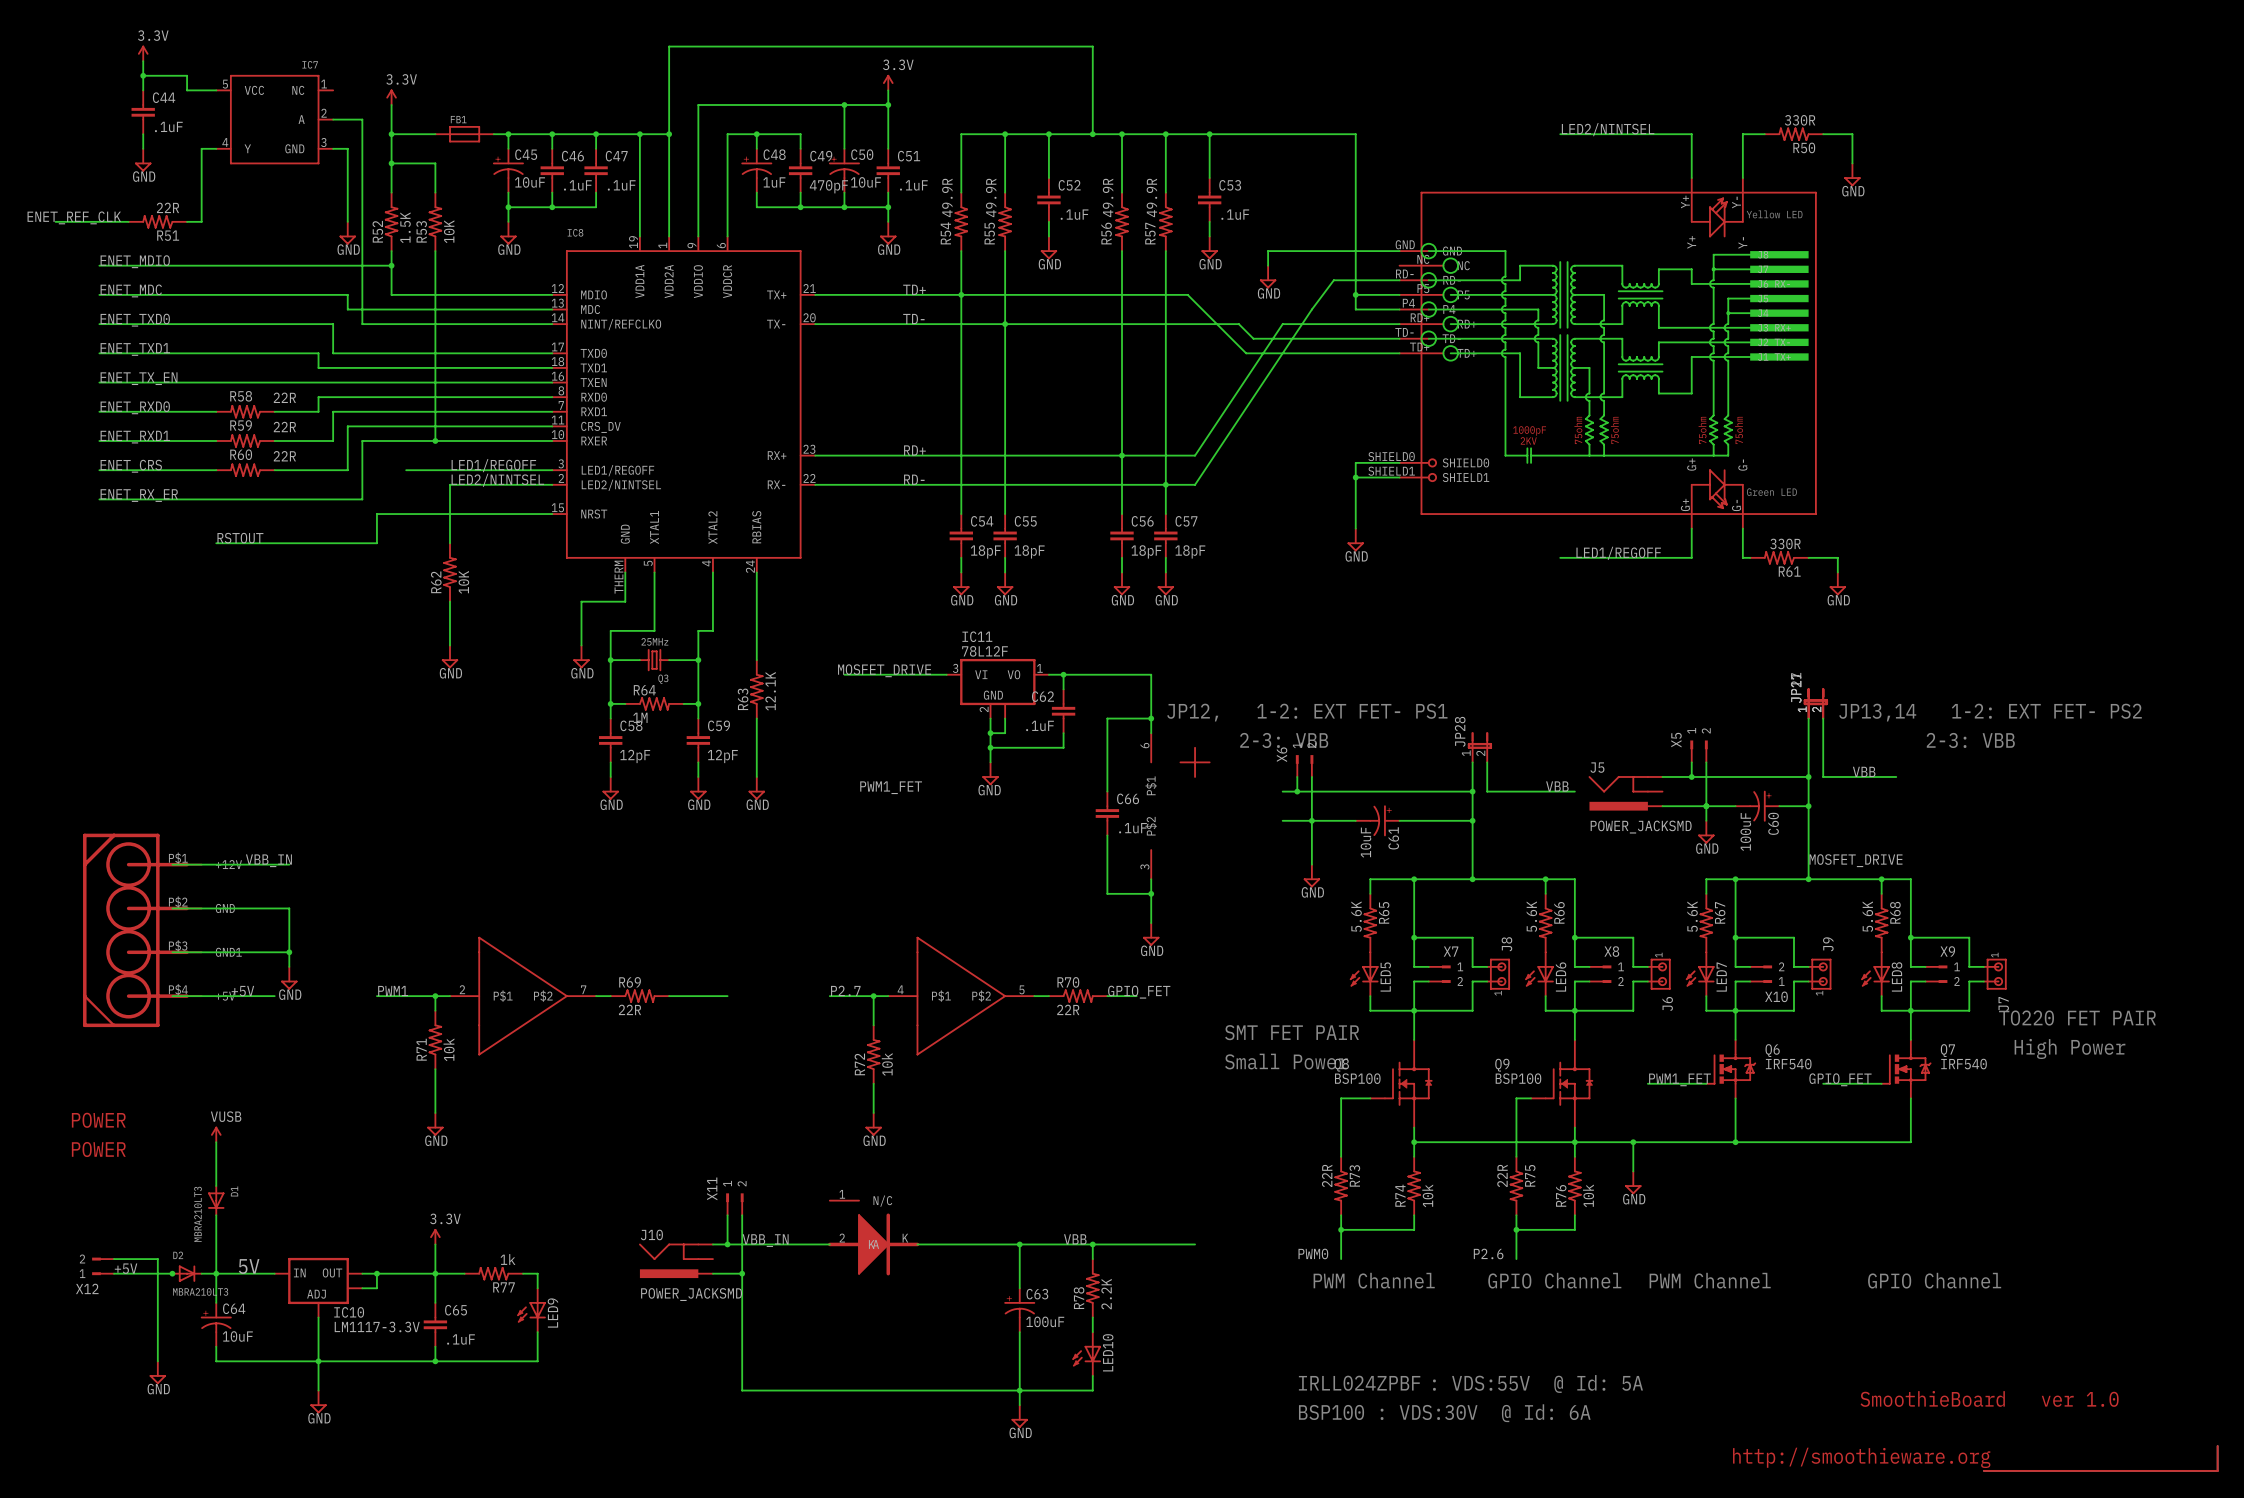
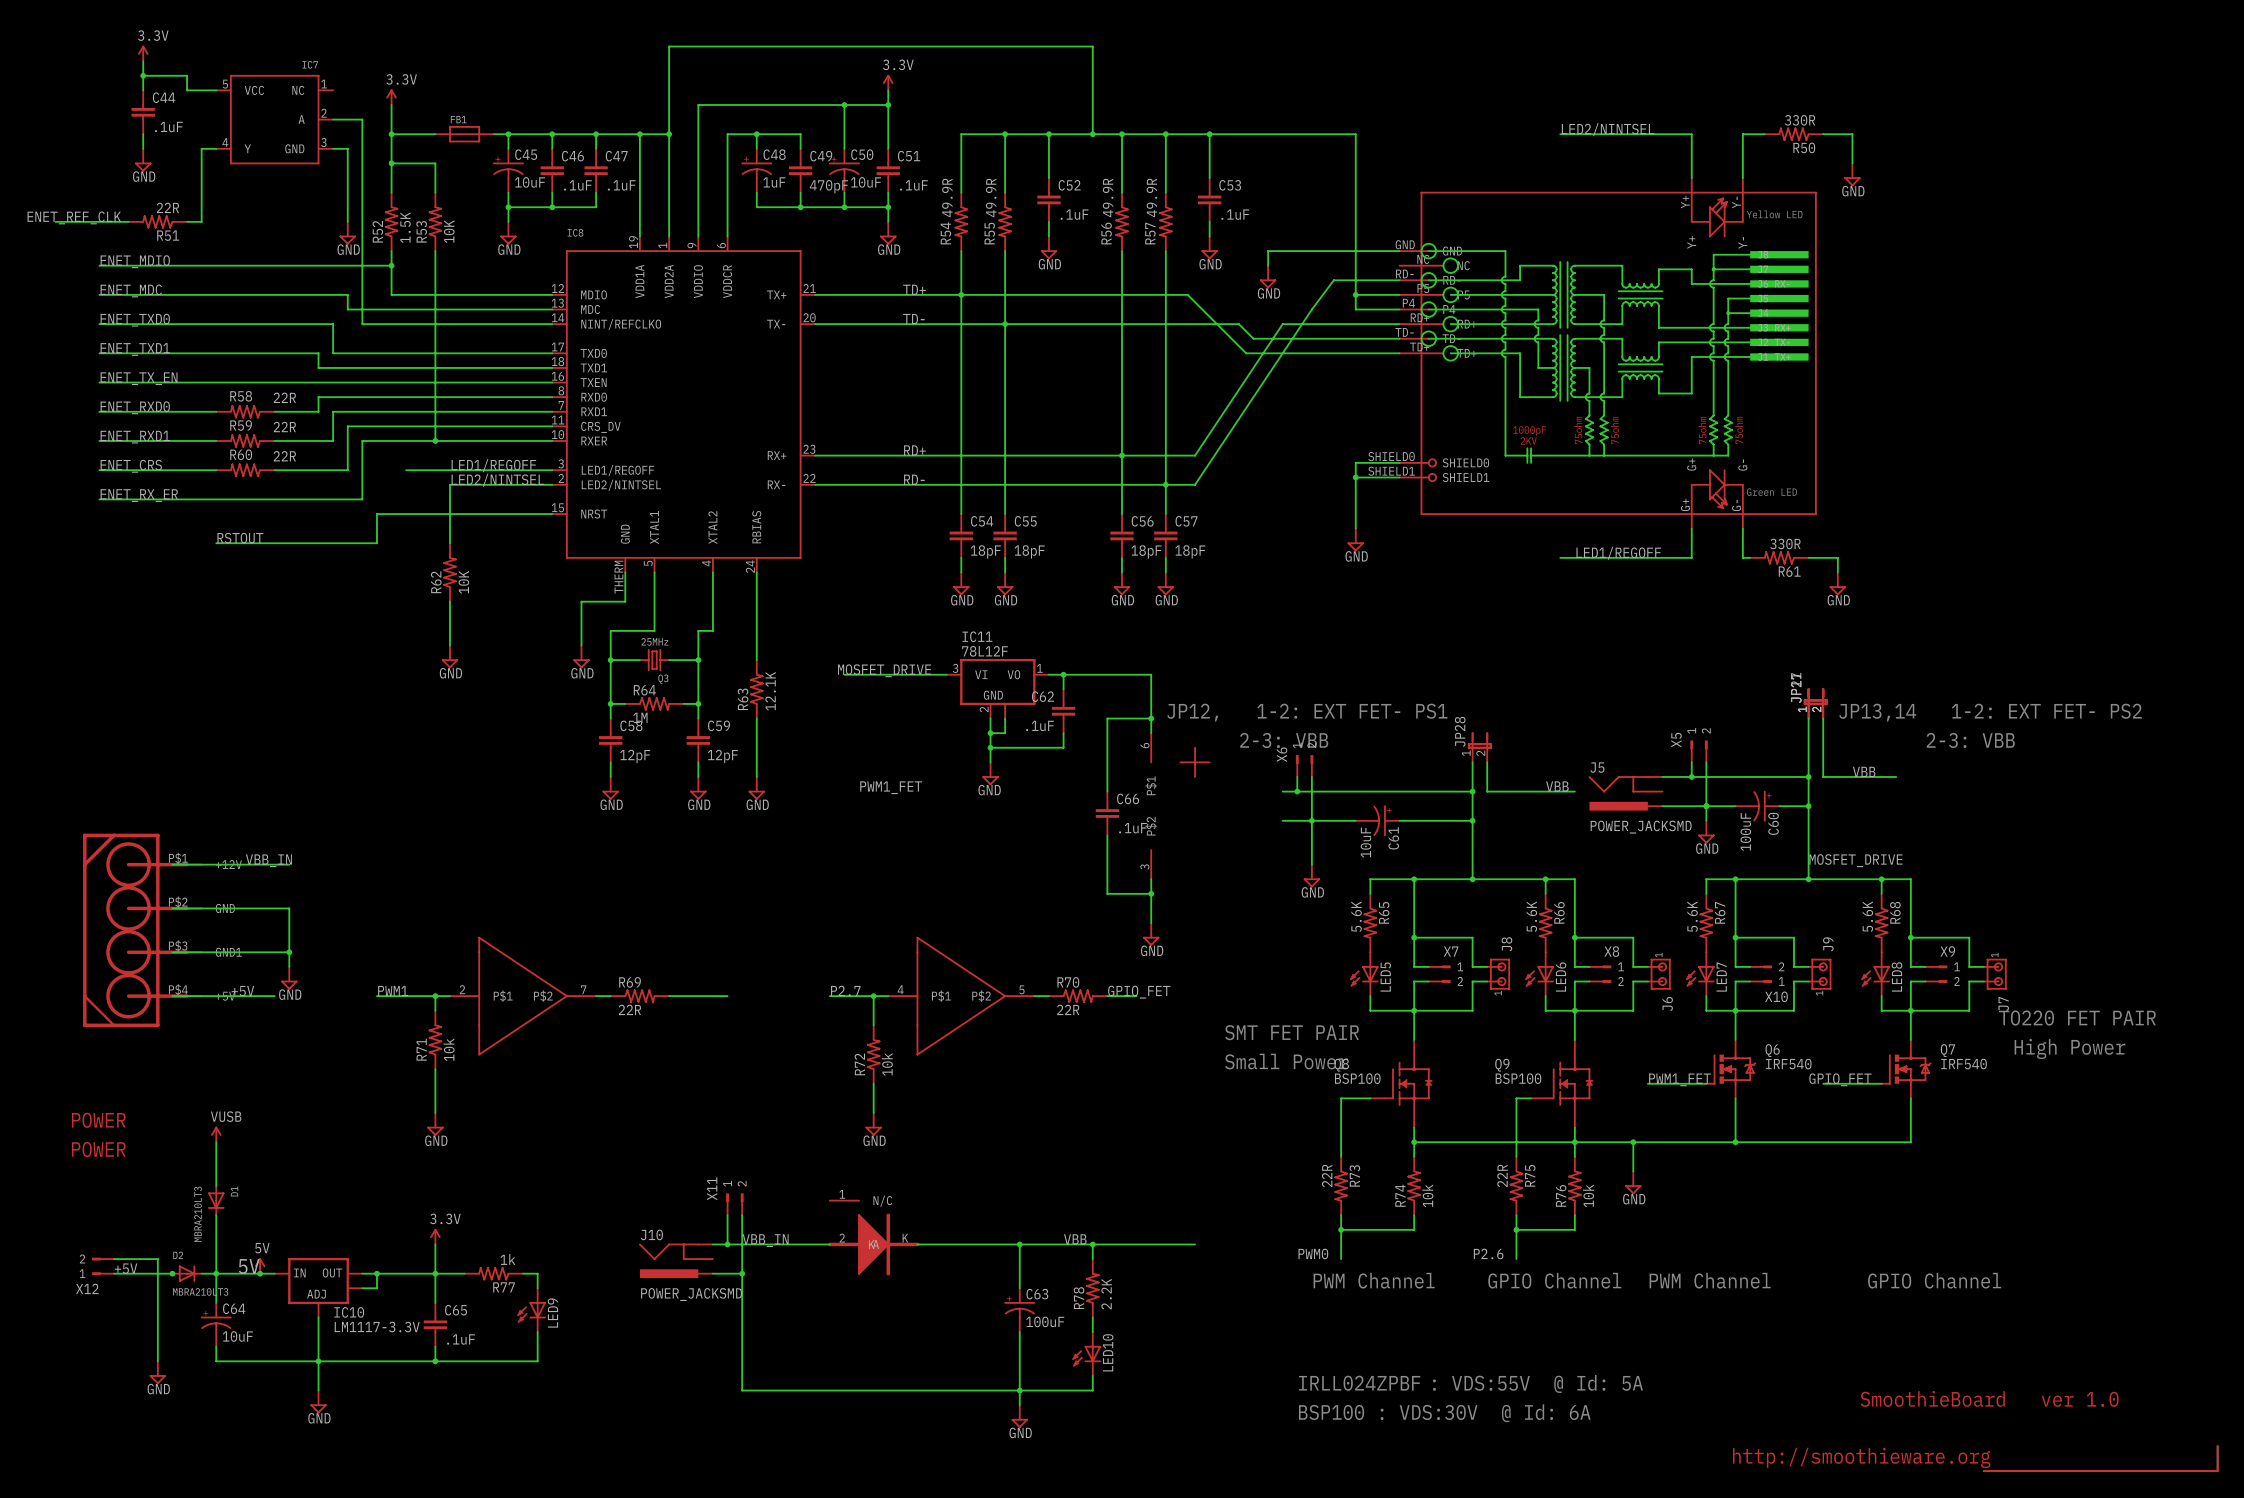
power symbol: none -> 5V (260, 1266)
junction: none -> (260, 1273)

